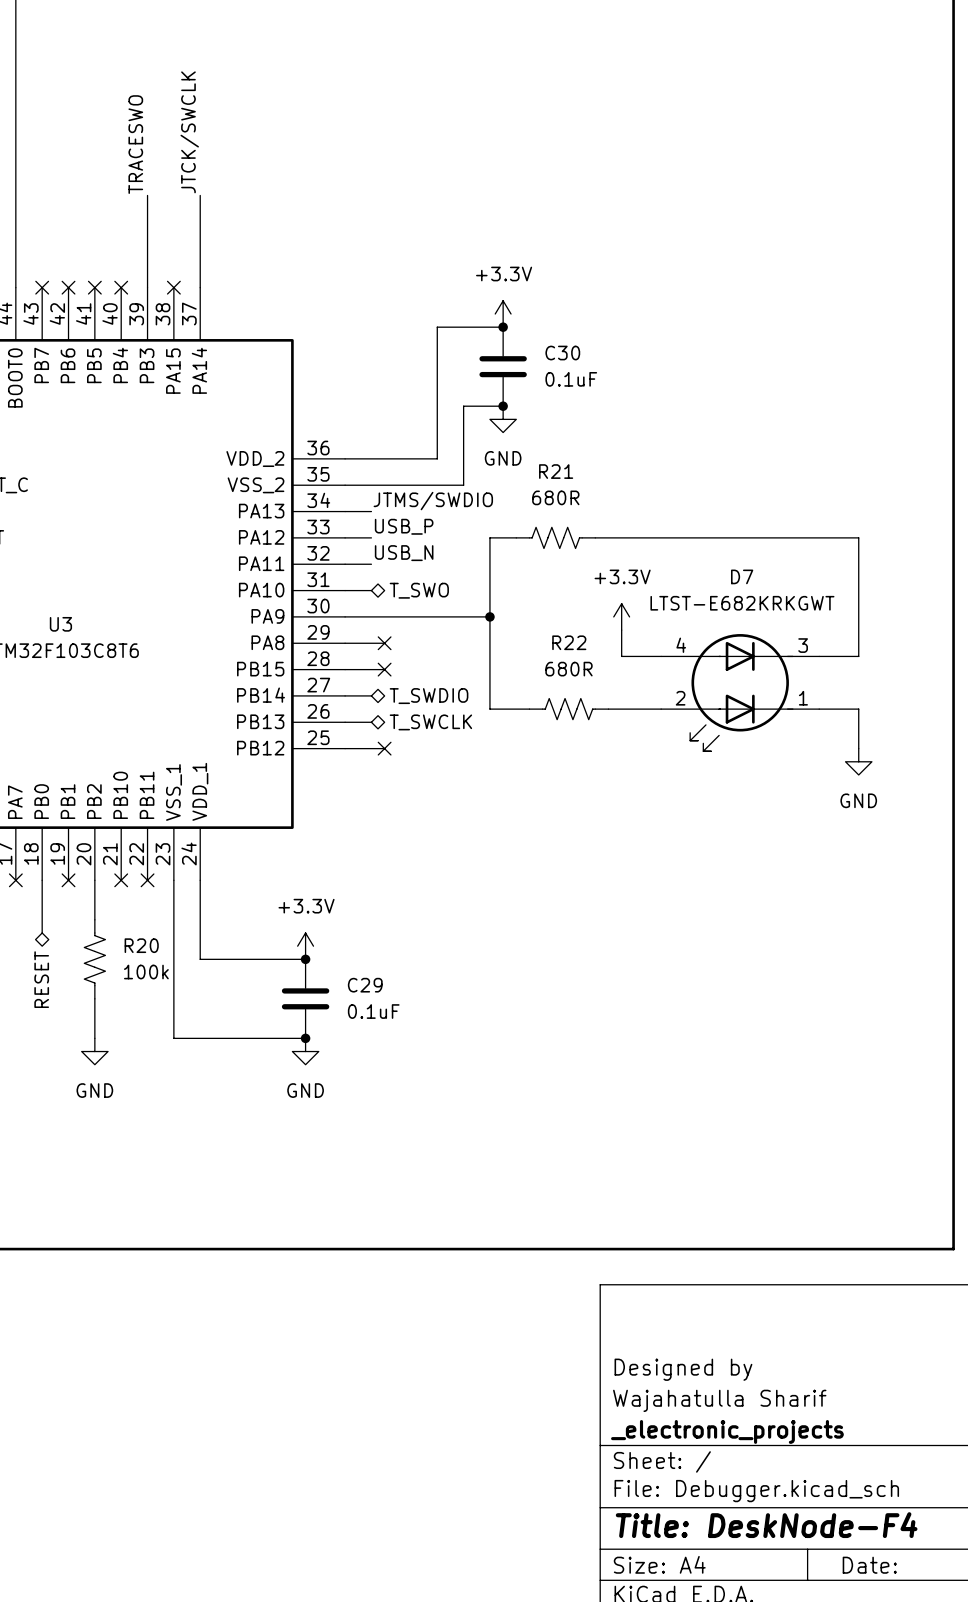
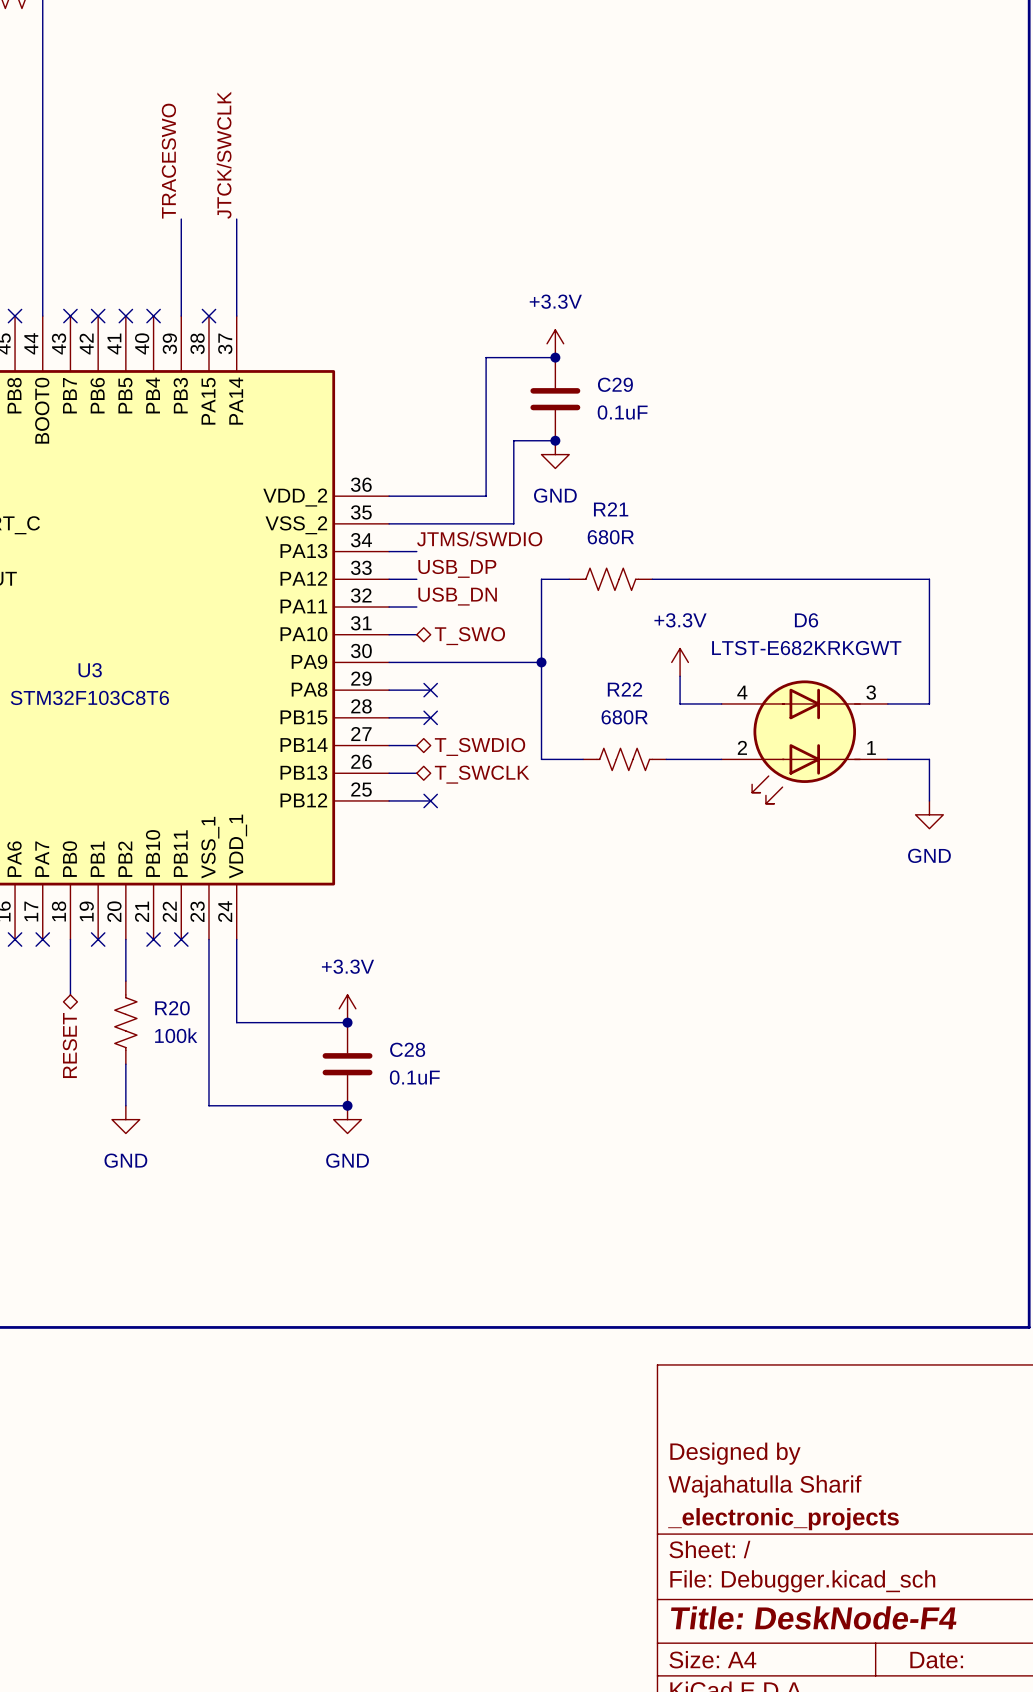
C30 name: C30 (562, 353) -> C29 (615, 384)
label: USB_P (404, 526) -> USB_DP (457, 568)
label: USB_N (404, 553) -> USB_DN (457, 596)
D7 name: D7 (742, 576) -> D6 (806, 620)
C29 name: C29 (365, 985) -> C28 (407, 1049)

